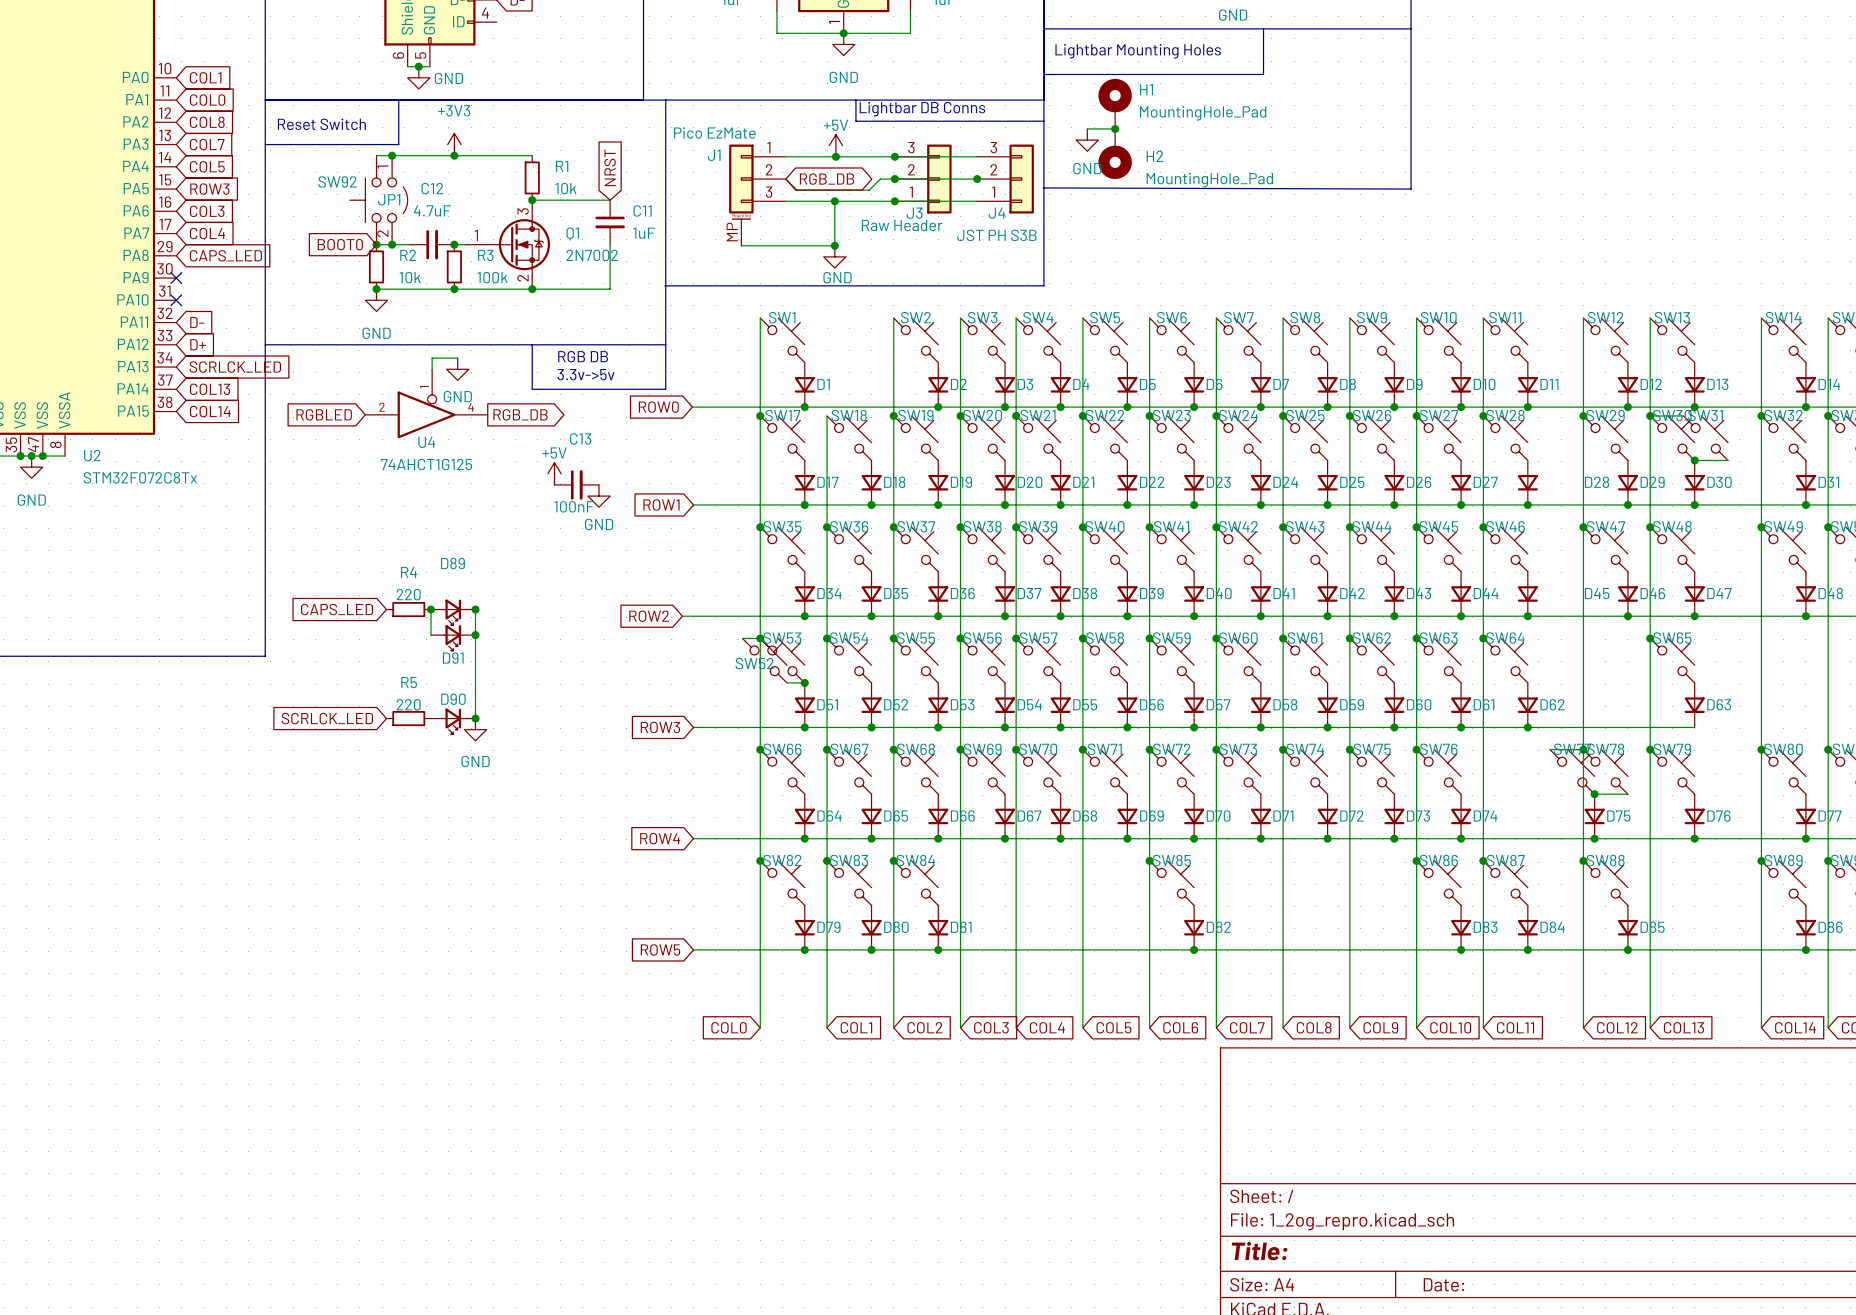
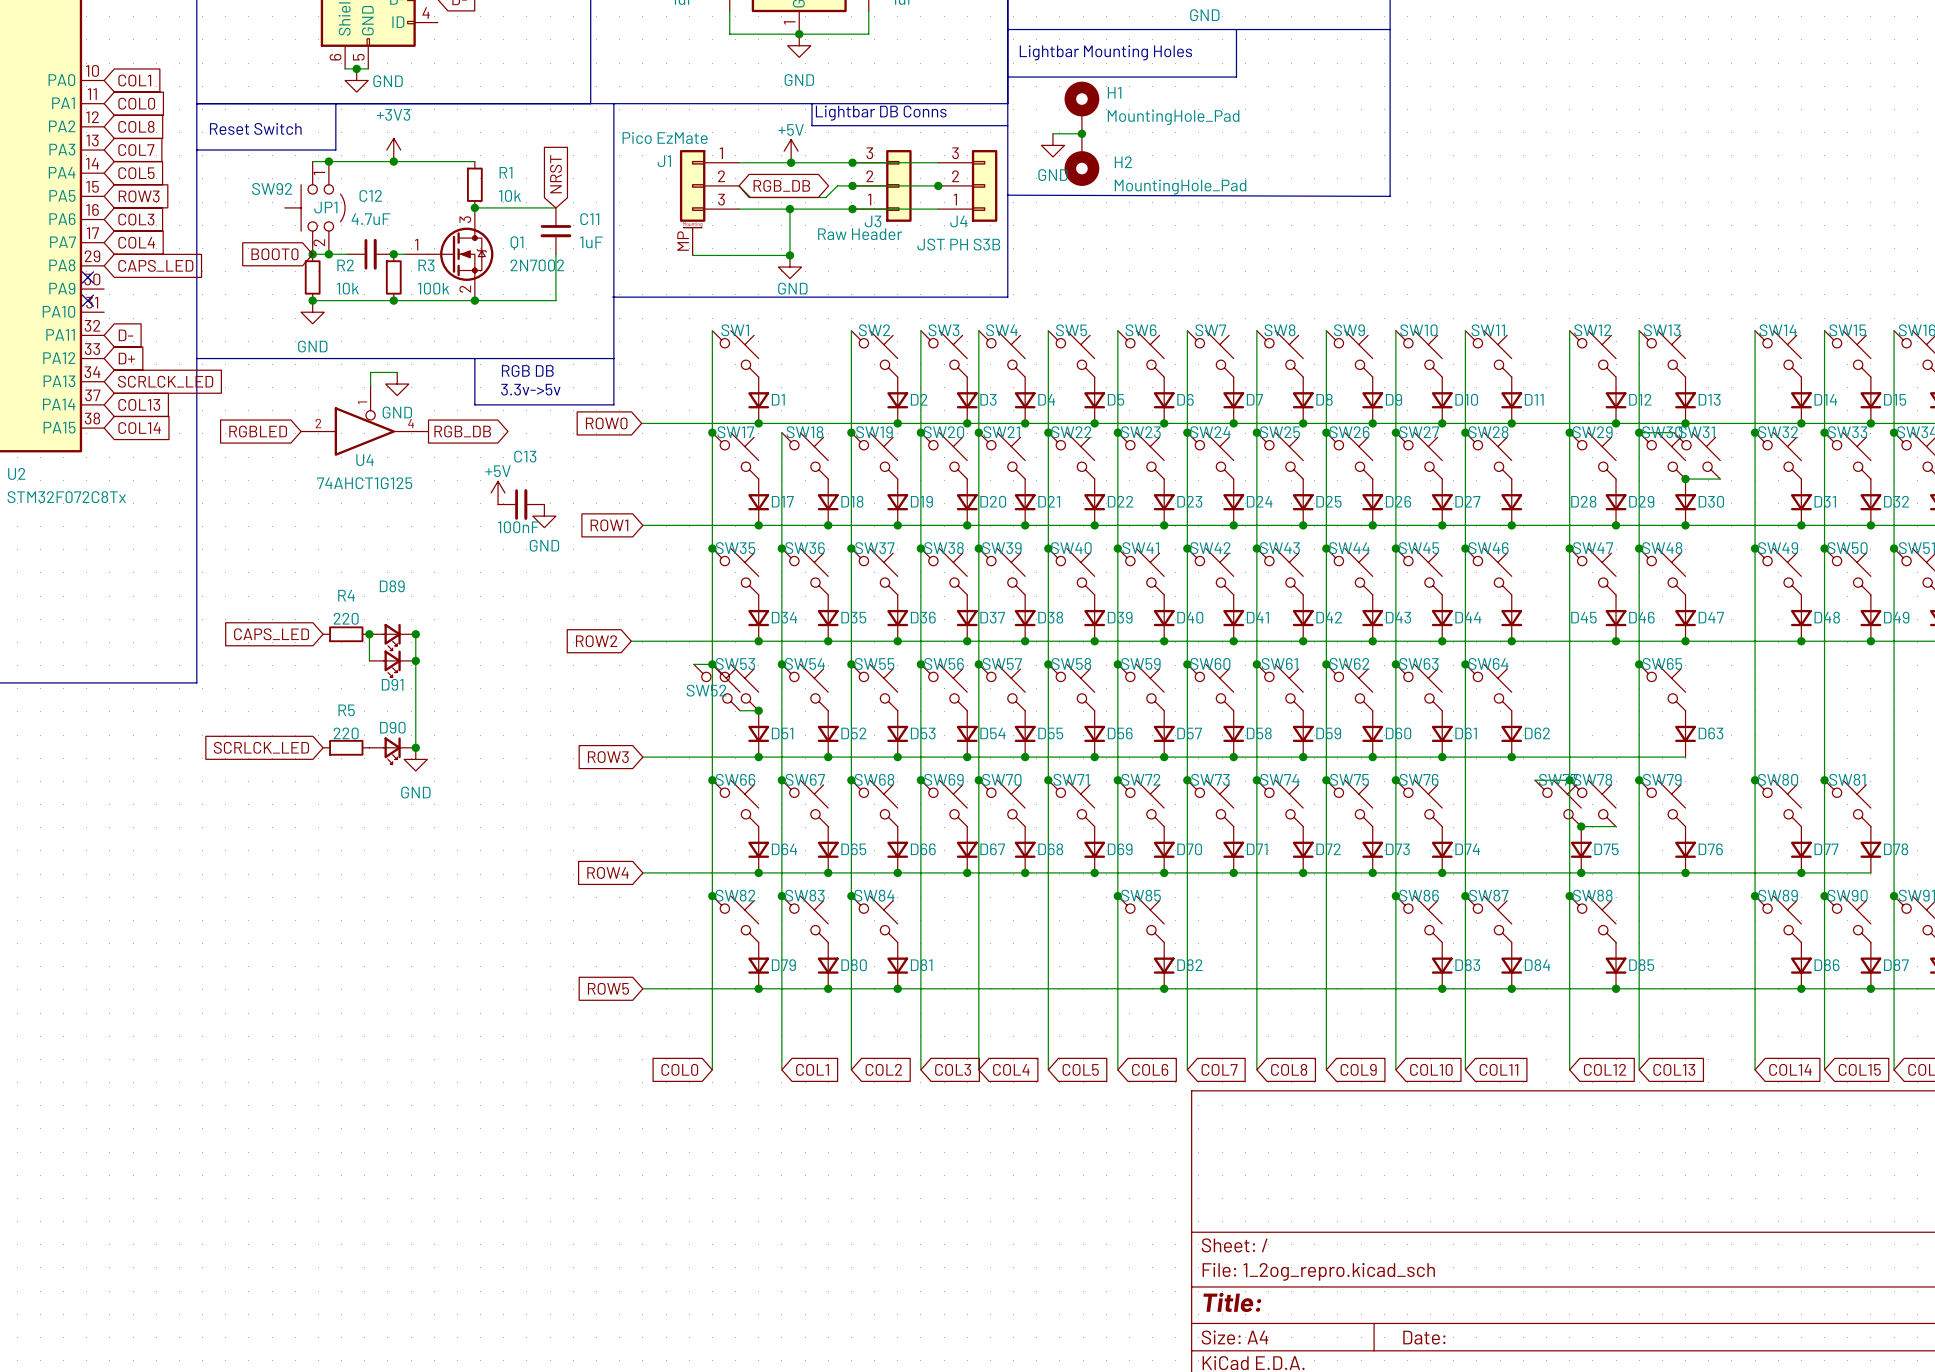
no-connect mark: none -> (87, 277)
no-connect mark: (176, 278) -> none
no-connect mark: none -> (87, 300)
no-connect mark: (176, 300) -> none

